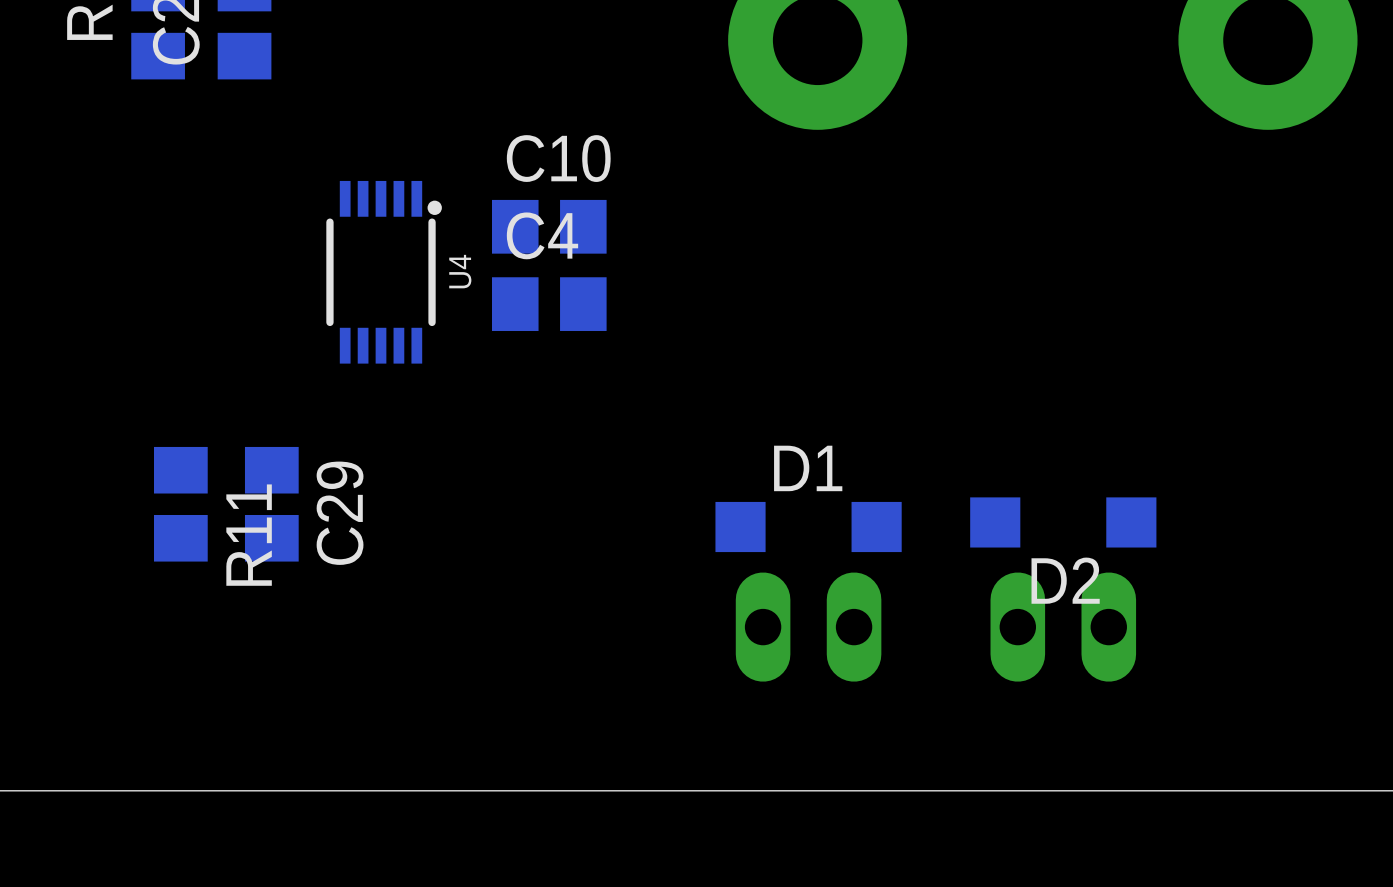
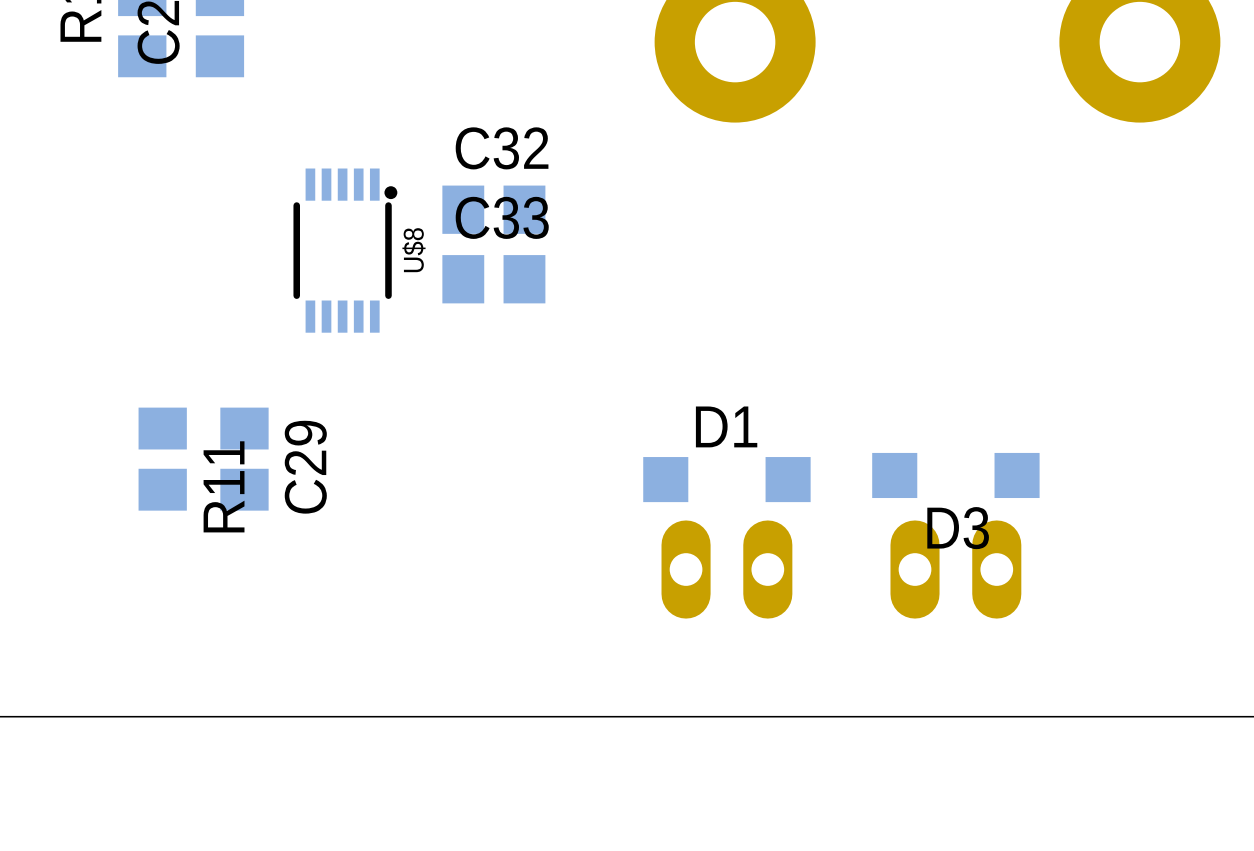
C10 name: C10 (558, 158) -> C32 (502, 148)
C4 name: C4 (542, 235) -> C33 (502, 217)
U4 name: U4 (460, 271) -> U$8 (413, 250)
D2 name: D2 (1065, 580) -> D3 (958, 528)

